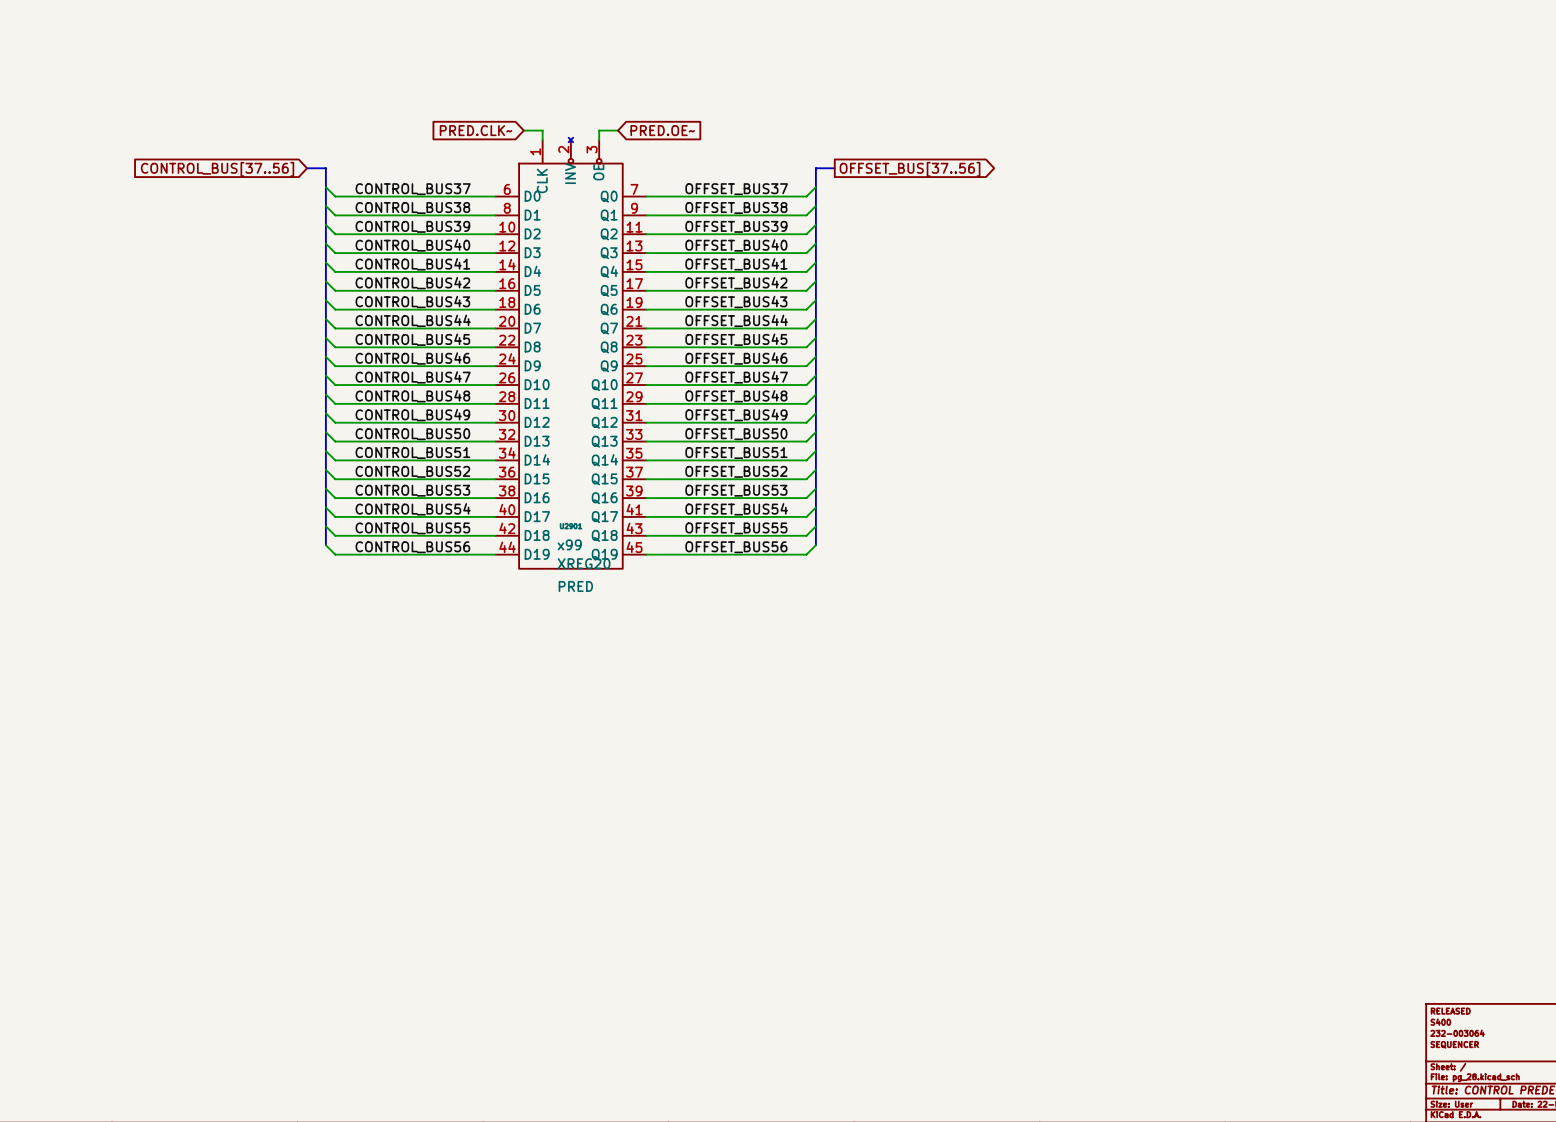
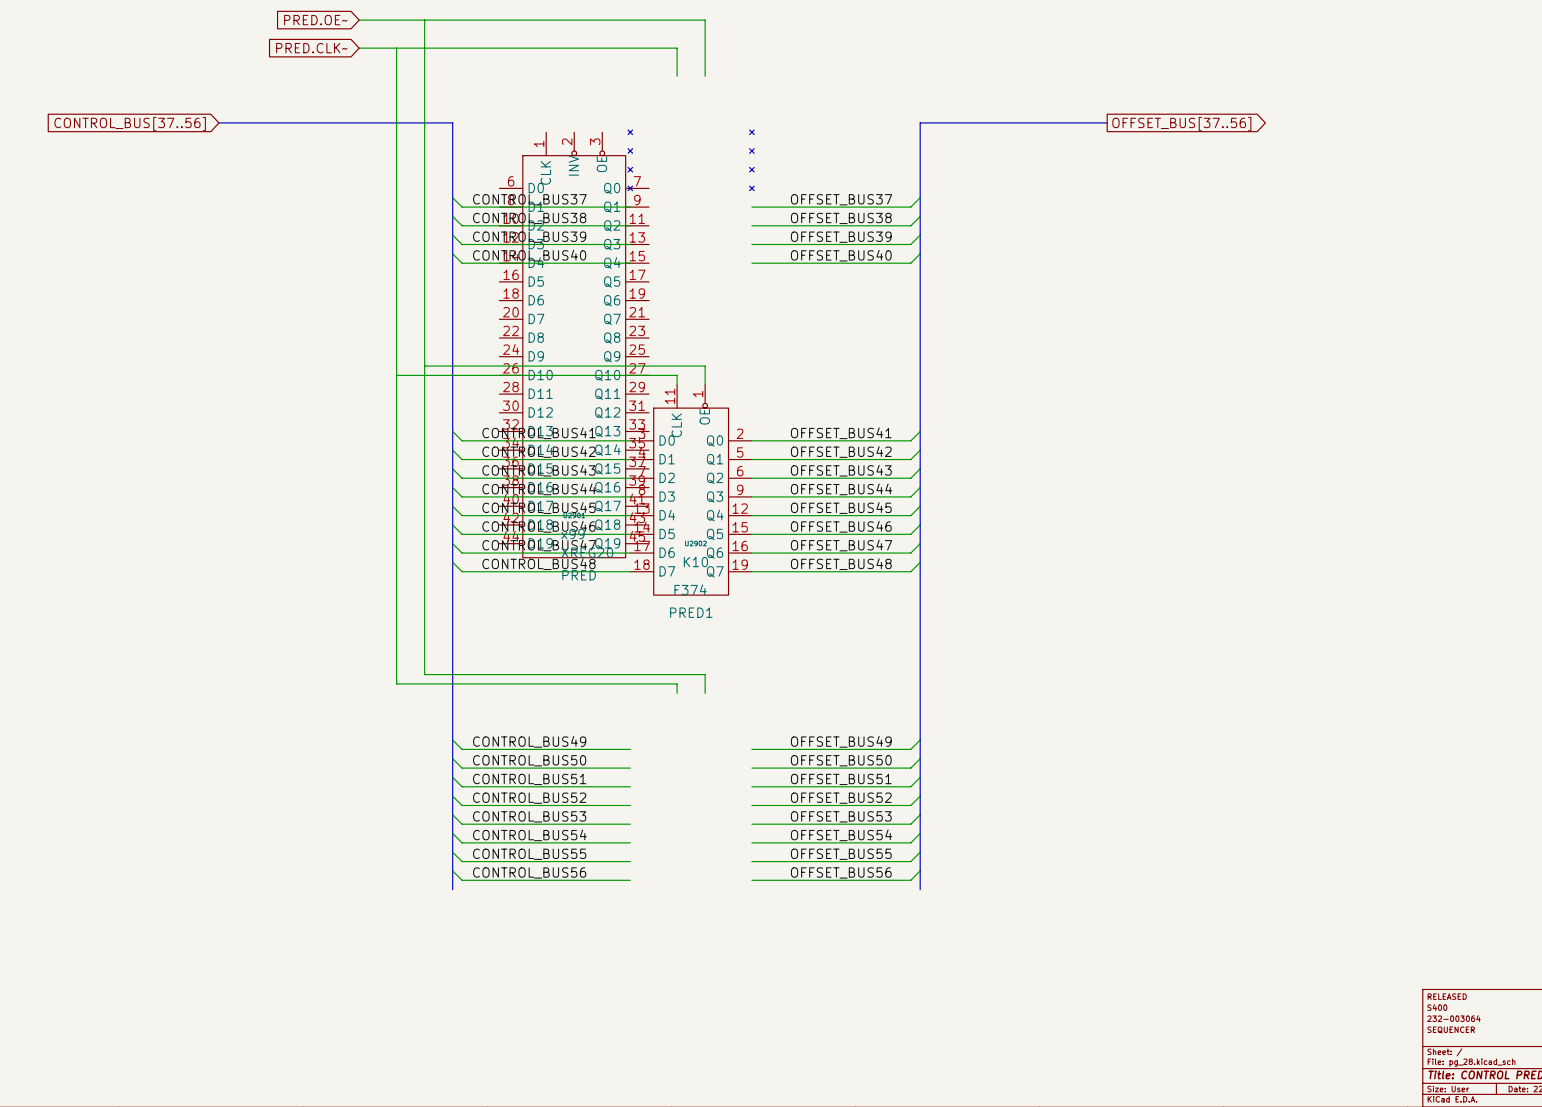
global label: none -> PRED.OE~ (315, 20)
wire: none -> (359, 20) (705, 20) (705, 76)
wire: none -> (424, 20) (424, 674) (705, 674) (705, 693)
global label: none -> PRED.CLK~ (311, 48)
wire: none -> (359, 48) (677, 48) (677, 76)
wire: none -> (396, 48) (396, 683) (677, 683) (677, 693)
bus: none -> (218, 122) (452, 122) (452, 889)
global label: PRED.CLK~ (476, 130) -> none
wire: (523, 130) (542, 130) (542, 140) -> none
wire: (618, 130) (599, 130) (599, 140) -> none
global label: PRED.OE~ (662, 130) -> none
bus: none -> (1107, 122) (920, 122) (920, 889)
global label: none -> CONTROL_BUS[37..56] (130, 124)
global label: none -> OFFSET_BUS[37..56] (1181, 124)
no-connect mark: (570, 140) -> none
no-connect mark: none -> (630, 132)
no-connect mark: none -> (751, 132)
no-connect mark: none -> (630, 150)
no-connect mark: none -> (751, 150)
bus: (307, 168) (325, 168) (325, 545) -> none
bus: (834, 168) (815, 168) (815, 545) -> none
global label: CONTROL_BUS[37..56] (217, 169) -> none
global label: OFFSET_BUS[37..56] (910, 169) -> none
no-connect mark: none -> (630, 169)
no-connect mark: none -> (751, 169)
wire: (325, 187) (335, 196) (495, 196) -> none
wire: (815, 187) (806, 196) (646, 196) -> none
label: CONTROL_BUS37 (413, 189) -> none
label: OFFSET_BUS37 (736, 189) -> none
no-connect mark: none -> (630, 188)
no-connect mark: none -> (751, 188)
wire: (325, 205) (335, 215) (457, 215) -> (452, 197) (462, 207)
wire: (815, 205) (806, 215) -> (920, 197) (910, 207) (807, 207)
label: CONTROL_BUS38 (412, 208) -> none
label: none -> CONTROL_BUS37 (529, 199)
label: OFFSET_BUS38 (736, 208) -> none
label: none -> OFFSET_BUS37 (841, 199)
wire: none -> (499, 207) (630, 207)
wire: (646, 215) (749, 215) -> none
wire: (325, 224) (335, 234) (457, 234) -> (452, 216) (462, 225)
wire: (815, 224) (806, 234) -> (920, 216) (910, 225) (807, 225)
label: CONTROL_BUS39 (412, 226) -> none
label: none -> CONTROL_BUS38 (529, 218)
label: OFFSET_BUS39 (736, 226) -> none
label: none -> OFFSET_BUS38 (841, 218)
wire: none -> (499, 225) (630, 225)
wire: (646, 234) (749, 234) -> none
wire: (325, 243) (335, 253) (457, 253) -> (452, 235) (462, 244)
wire: (815, 243) (806, 253) -> (920, 235) (910, 244) (807, 244)
label: CONTROL_BUS40 (412, 245) -> none
label: none -> CONTROL_BUS39 (529, 237)
label: OFFSET_BUS40 (736, 245) -> none
label: none -> OFFSET_BUS39 (841, 237)
wire: none -> (499, 244) (630, 244)
wire: (646, 253) (749, 253) -> none
wire: (325, 262) (335, 271) (457, 271) -> (452, 253) (462, 263)
wire: (815, 262) (806, 271) -> (920, 253) (910, 263) (807, 263)
label: CONTROL_BUS41 (412, 264) -> none
label: none -> CONTROL_BUS40 (529, 255)
label: OFFSET_BUS41 (736, 264) -> none
label: none -> OFFSET_BUS40 (841, 255)
wire: none -> (499, 263) (630, 263)
wire: (646, 271) (749, 271) -> none
wire: (325, 281) (335, 290) (495, 290) -> none
wire: (815, 281) (806, 290) (646, 290) -> none
label: CONTROL_BUS42 (412, 283) -> none
label: OFFSET_BUS42 (736, 283) -> none
wire: (325, 300) (335, 309) (495, 309) -> none
wire: (815, 300) (806, 309) (646, 309) -> none
label: CONTROL_BUS43 (412, 302) -> none
label: OFFSET_BUS43 (736, 302) -> none
wire: (325, 319) (335, 328) (495, 328) -> none
wire: (815, 319) (806, 328) (646, 328) -> none
label: CONTROL_BUS44 (413, 320) -> none
label: OFFSET_BUS44 (736, 320) -> none
wire: (325, 337) (335, 347) (495, 347) -> none
wire: (815, 337) (806, 347) (646, 347) -> none
label: CONTROL_BUS45 (412, 339) -> none
label: OFFSET_BUS45 (736, 339) -> none
wire: (325, 356) (335, 366) (495, 366) -> none
wire: (815, 356) (806, 366) (646, 366) -> none
label: CONTROL_BUS46 (412, 358) -> none
label: OFFSET_BUS46 (736, 358) -> none
wire: (325, 375) (335, 385) (391, 385) -> none
wire: none -> (424, 366) (705, 366) (705, 384)
wire: (815, 375) (806, 385) (674, 385) -> (677, 384) (677, 375)
label: CONTROL_BUS47 (413, 377) -> none
label: OFFSET_BUS47 (736, 377) -> none
wire: none -> (499, 375) (649, 375)
wire: (325, 394) (335, 403) (495, 403) -> none
wire: (815, 394) (806, 403) (646, 403) -> none
label: CONTROL_BUS48 (412, 396) -> none
label: OFFSET_BUS48 (736, 396) -> none
wire: (325, 413) (335, 422) (495, 422) -> none
wire: (815, 413) (806, 422) (646, 422) -> none
label: CONTROL_BUS49 (412, 415) -> none
label: OFFSET_BUS49 (736, 415) -> none
wire: (325, 432) (335, 441) (495, 441) -> none
wire: (815, 432) (806, 441) (646, 441) -> none
label: CONTROL_BUS50 (412, 434) -> none
label: OFFSET_BUS50 (736, 434) -> none
wire: none -> (452, 431) (462, 440) (630, 440)
wire: none -> (920, 431) (910, 440) (751, 440)
label: none -> CONTROL_BUS41 (538, 433)
label: none -> OFFSET_BUS41 (841, 433)
wire: (325, 450) (335, 460) (495, 460) -> none
wire: (815, 450) (806, 460) (646, 460) -> none
label: CONTROL_BUS51 (412, 453) -> none
label: OFFSET_BUS51 (736, 453) -> none
wire: none -> (452, 450) (462, 459) (630, 459)
wire: none -> (920, 450) (910, 459) (751, 459)
label: none -> CONTROL_BUS42 (538, 451)
label: none -> OFFSET_BUS42 (841, 451)
wire: (325, 469) (335, 479) (495, 479) -> none
wire: (815, 469) (806, 479) (646, 479) -> none
label: CONTROL_BUS52 (412, 471) -> none
label: OFFSET_BUS52 (736, 471) -> none
wire: none -> (452, 468) (462, 478) (630, 478)
wire: none -> (920, 468) (910, 478) (751, 478)
label: none -> CONTROL_BUS43 (538, 470)
label: none -> OFFSET_BUS43 (841, 470)
wire: (325, 488) (335, 498) (495, 498) -> none
wire: (815, 488) (806, 498) (646, 498) -> none
label: CONTROL_BUS53 (412, 490) -> none
label: OFFSET_BUS53 (736, 490) -> none
wire: none -> (452, 487) (462, 496) (630, 496)
wire: none -> (920, 487) (910, 496) (751, 496)
label: none -> CONTROL_BUS44 (539, 489)
label: none -> OFFSET_BUS44 (841, 489)
part: none -> F374 (691, 489)
wire: (325, 507) (335, 516) (495, 516) -> none
wire: (815, 507) (806, 516) (646, 516) -> none
label: CONTROL_BUS54 (413, 509) -> none
label: OFFSET_BUS54 (736, 509) -> none
wire: none -> (452, 506) (462, 515) (630, 515)
wire: none -> (920, 506) (910, 515) (751, 515)
label: none -> CONTROL_BUS45 (538, 508)
label: none -> OFFSET_BUS45 (841, 508)
wire: (325, 526) (335, 535) (495, 535) -> none
wire: (815, 526) (806, 535) (646, 535) -> none
label: CONTROL_BUS55 (412, 528) -> none
label: OFFSET_BUS55 (736, 528) -> none
wire: none -> (452, 524) (462, 534) (630, 534)
wire: none -> (920, 524) (910, 534) (751, 534)
label: none -> CONTROL_BUS46 (538, 526)
label: none -> OFFSET_BUS46 (841, 526)
wire: (325, 545) (335, 554) (495, 554) -> none
wire: (815, 545) (806, 554) (646, 554) -> none
label: CONTROL_BUS56 (412, 547) -> none
label: OFFSET_BUS56 (736, 547) -> none
wire: none -> (452, 543) (462, 553) (630, 553)
wire: none -> (920, 543) (910, 553) (751, 553)
label: none -> CONTROL_BUS47 (539, 545)
label: none -> OFFSET_BUS47 (841, 545)
wire: none -> (452, 562) (462, 571) (630, 571)
wire: none -> (920, 562) (910, 571) (751, 571)
label: none -> CONTROL_BUS48 (538, 564)
label: none -> OFFSET_BUS48 (841, 564)
wire: none -> (452, 740) (462, 749) (630, 749)
wire: none -> (920, 740) (910, 749) (751, 749)
label: none -> CONTROL_BUS49 (529, 741)
label: none -> OFFSET_BUS49 (841, 741)
wire: none -> (452, 758) (462, 768) (630, 768)
wire: none -> (920, 758) (910, 768) (751, 768)
label: none -> CONTROL_BUS50 (529, 760)
label: none -> OFFSET_BUS50 (841, 760)
wire: none -> (452, 777) (462, 786) (630, 786)
wire: none -> (920, 777) (910, 786) (751, 786)
label: none -> CONTROL_BUS51 (529, 779)
label: none -> OFFSET_BUS51 (841, 779)
wire: none -> (452, 796) (462, 805) (630, 805)
wire: none -> (920, 796) (910, 805) (751, 805)
label: none -> CONTROL_BUS52 (529, 798)
label: none -> OFFSET_BUS52 (841, 798)
wire: none -> (452, 814) (462, 824) (630, 824)
wire: none -> (920, 814) (910, 824) (751, 824)
label: none -> CONTROL_BUS53 (529, 816)
label: none -> OFFSET_BUS53 (841, 816)
wire: none -> (452, 833) (462, 842) (630, 842)
wire: none -> (920, 833) (910, 842) (751, 842)
label: none -> CONTROL_BUS54 (529, 835)
label: none -> OFFSET_BUS54 (841, 835)
wire: none -> (452, 852) (462, 861) (630, 861)
wire: none -> (920, 852) (910, 861) (751, 861)
label: none -> CONTROL_BUS55 (529, 854)
label: none -> OFFSET_BUS55 (841, 854)
wire: none -> (452, 870) (462, 880) (630, 880)
wire: none -> (920, 870) (910, 880) (751, 880)
label: none -> CONTROL_BUS56 (529, 872)
label: none -> OFFSET_BUS56 (841, 872)

